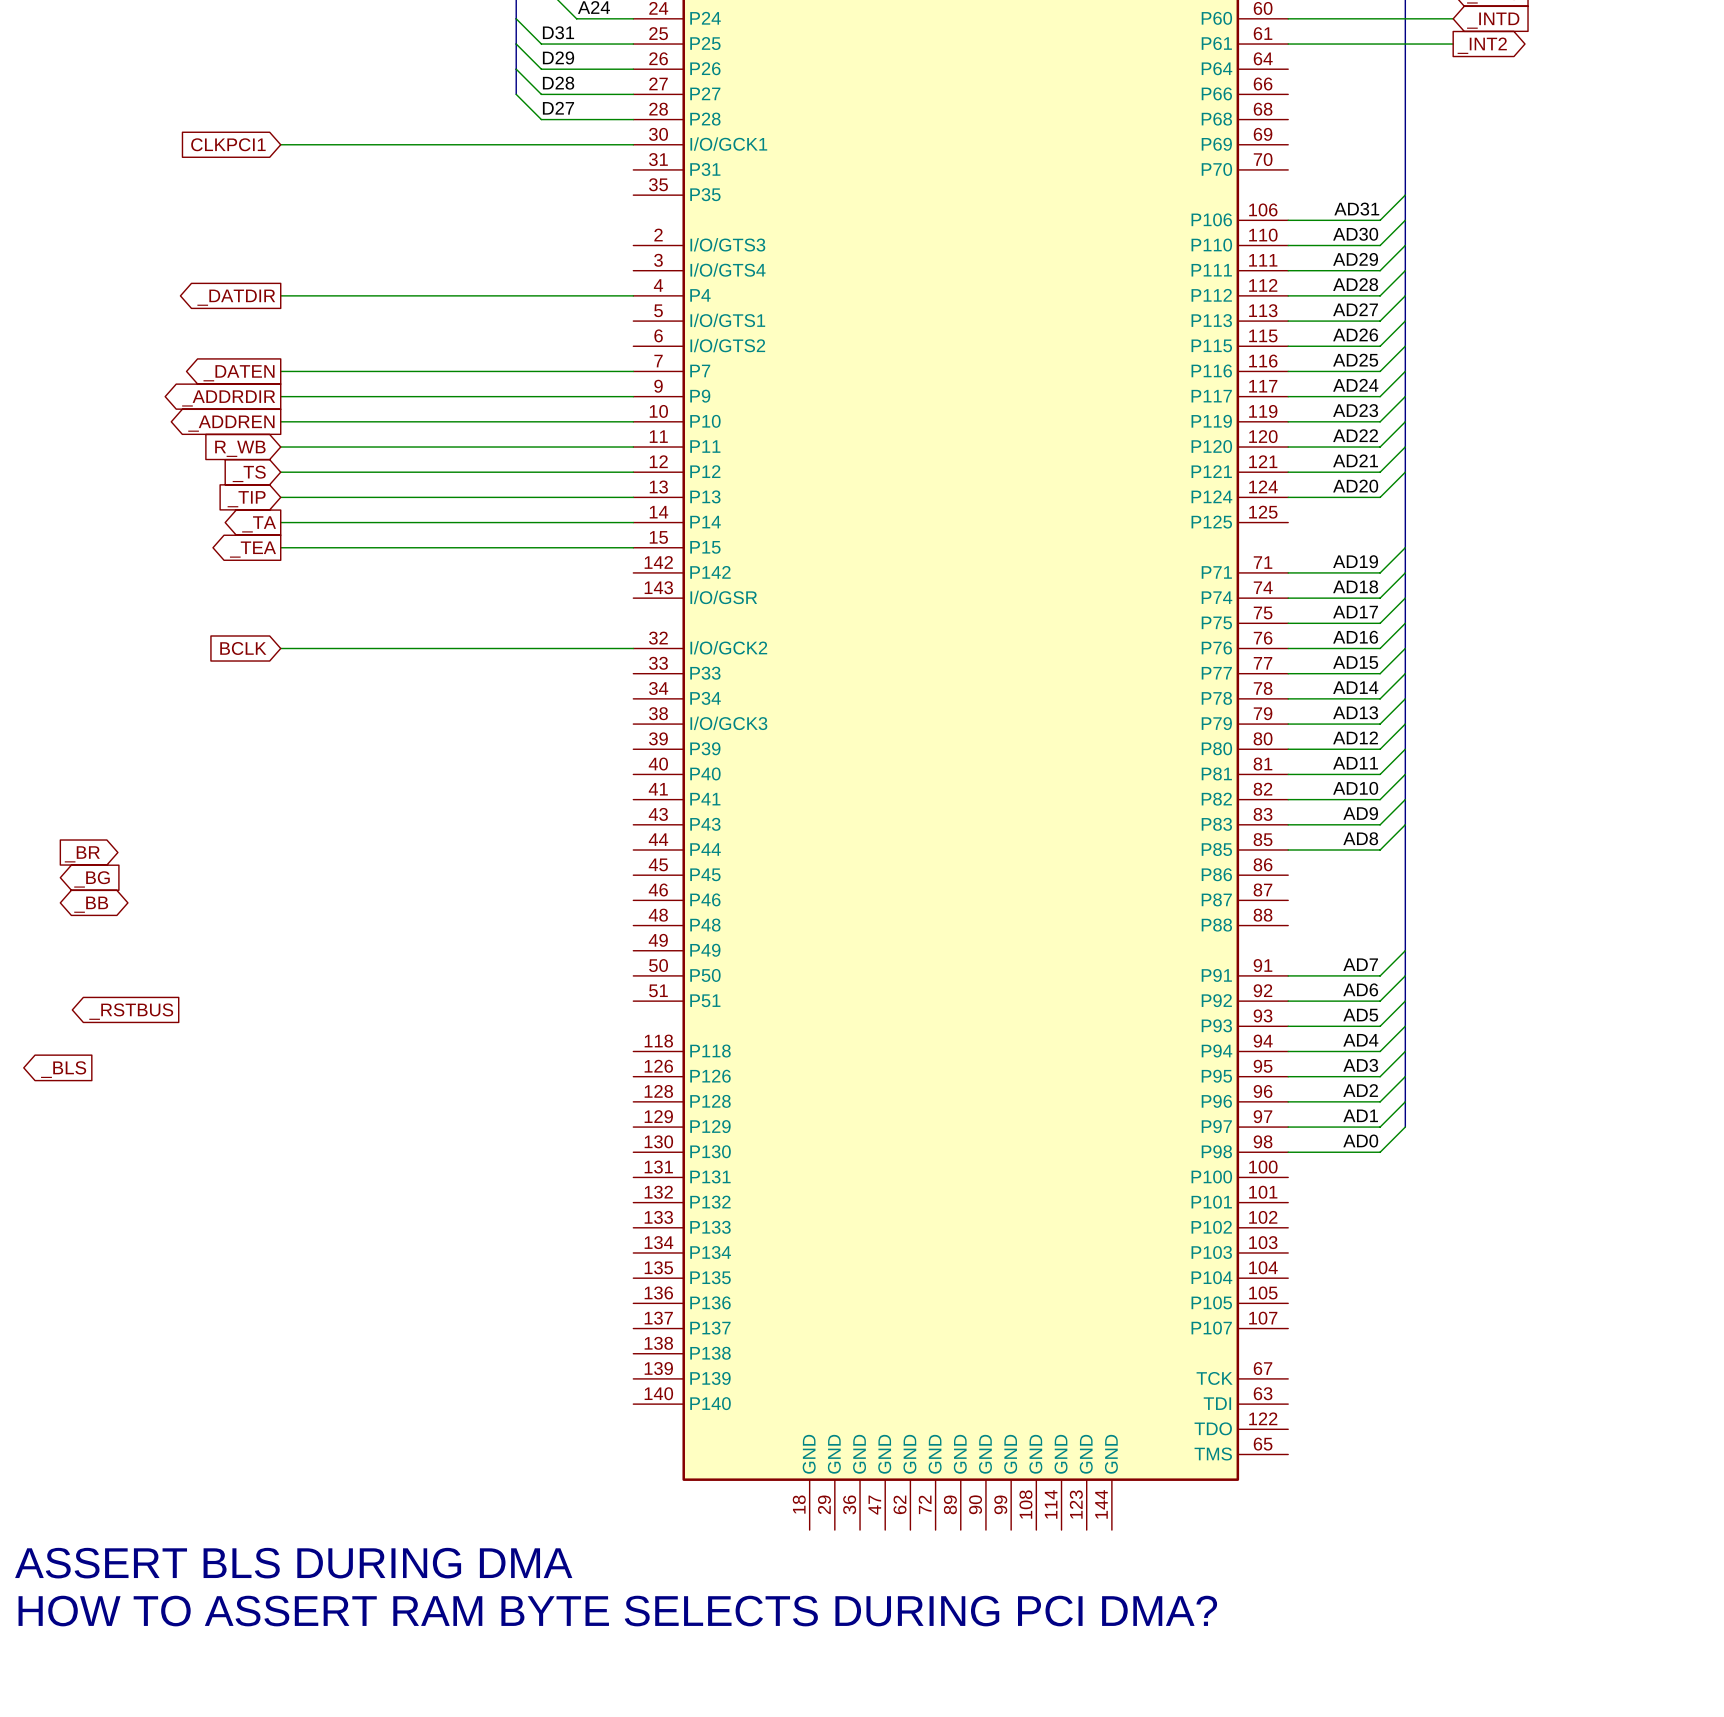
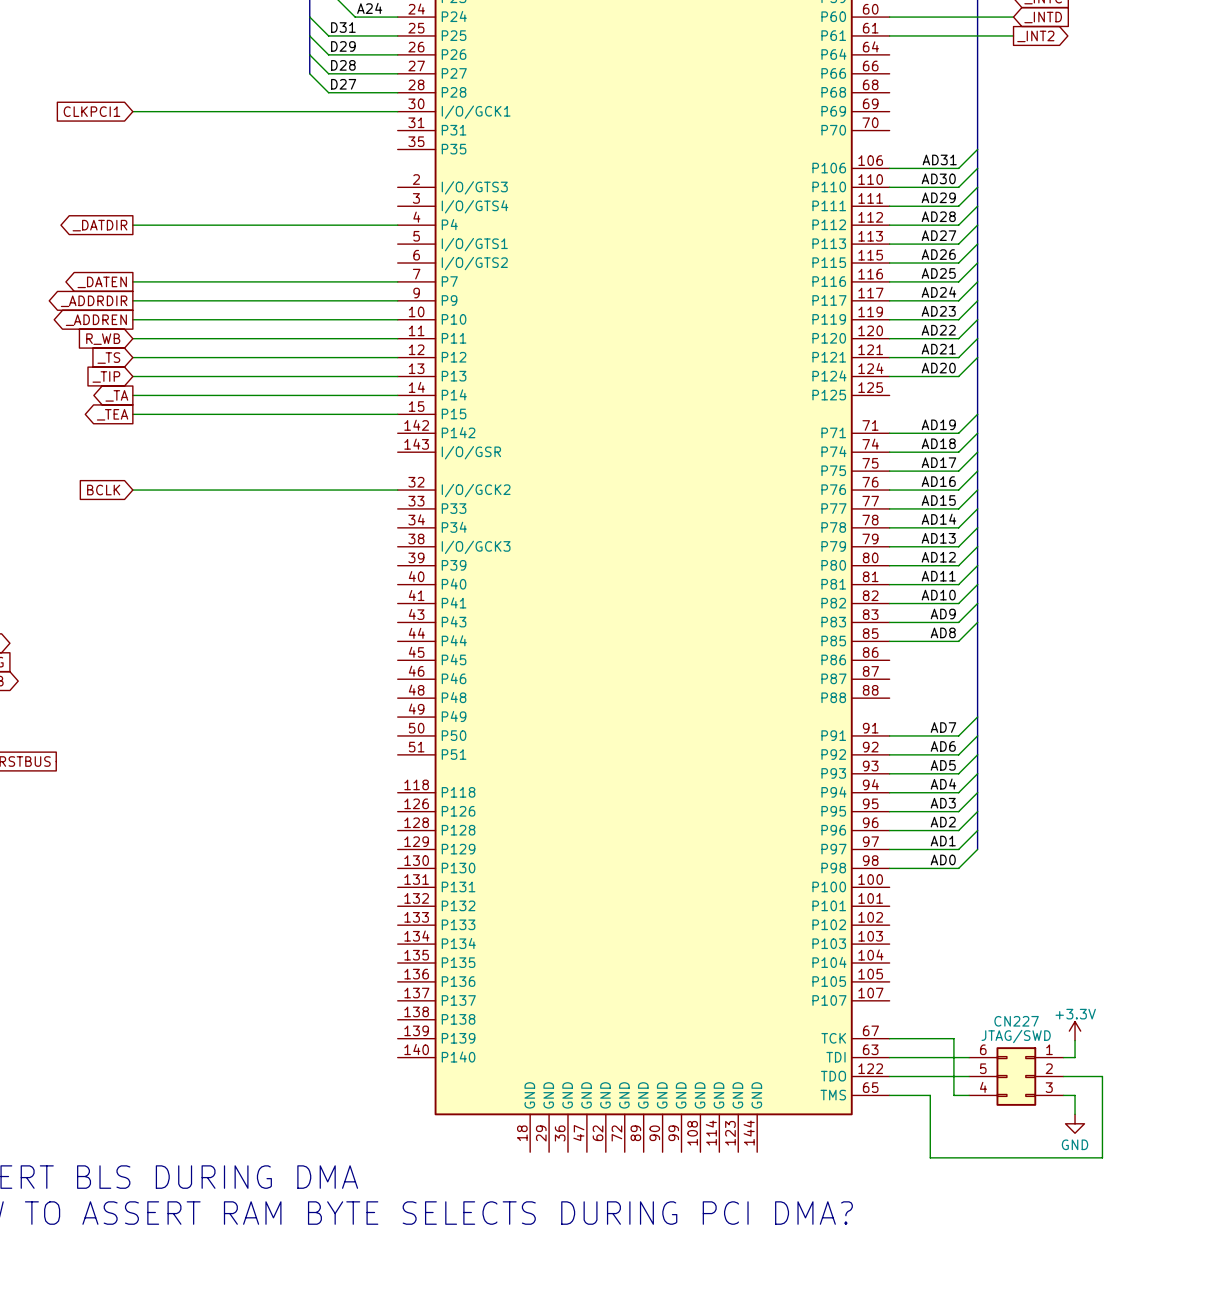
power symbol: none -> +3.3V (1075, 1031)
wire: none -> (889, 1038) (953, 1038) (953, 1095) (969, 1095)
wire: none -> (1075, 1040) (1075, 1057) (1063, 1057)
wire: none -> (889, 1057) (969, 1057)
wire: none -> (889, 1076) (969, 1076)
CN227: none -> JTAG/SWD (1016, 1076)
wire: none -> (1063, 1076) (1102, 1076) (1102, 1157) (930, 1157) (930, 1095) (889, 1095)
wire: none -> (1063, 1095) (1075, 1095) (1075, 1114)
power symbol: none -> GND (1075, 1123)

